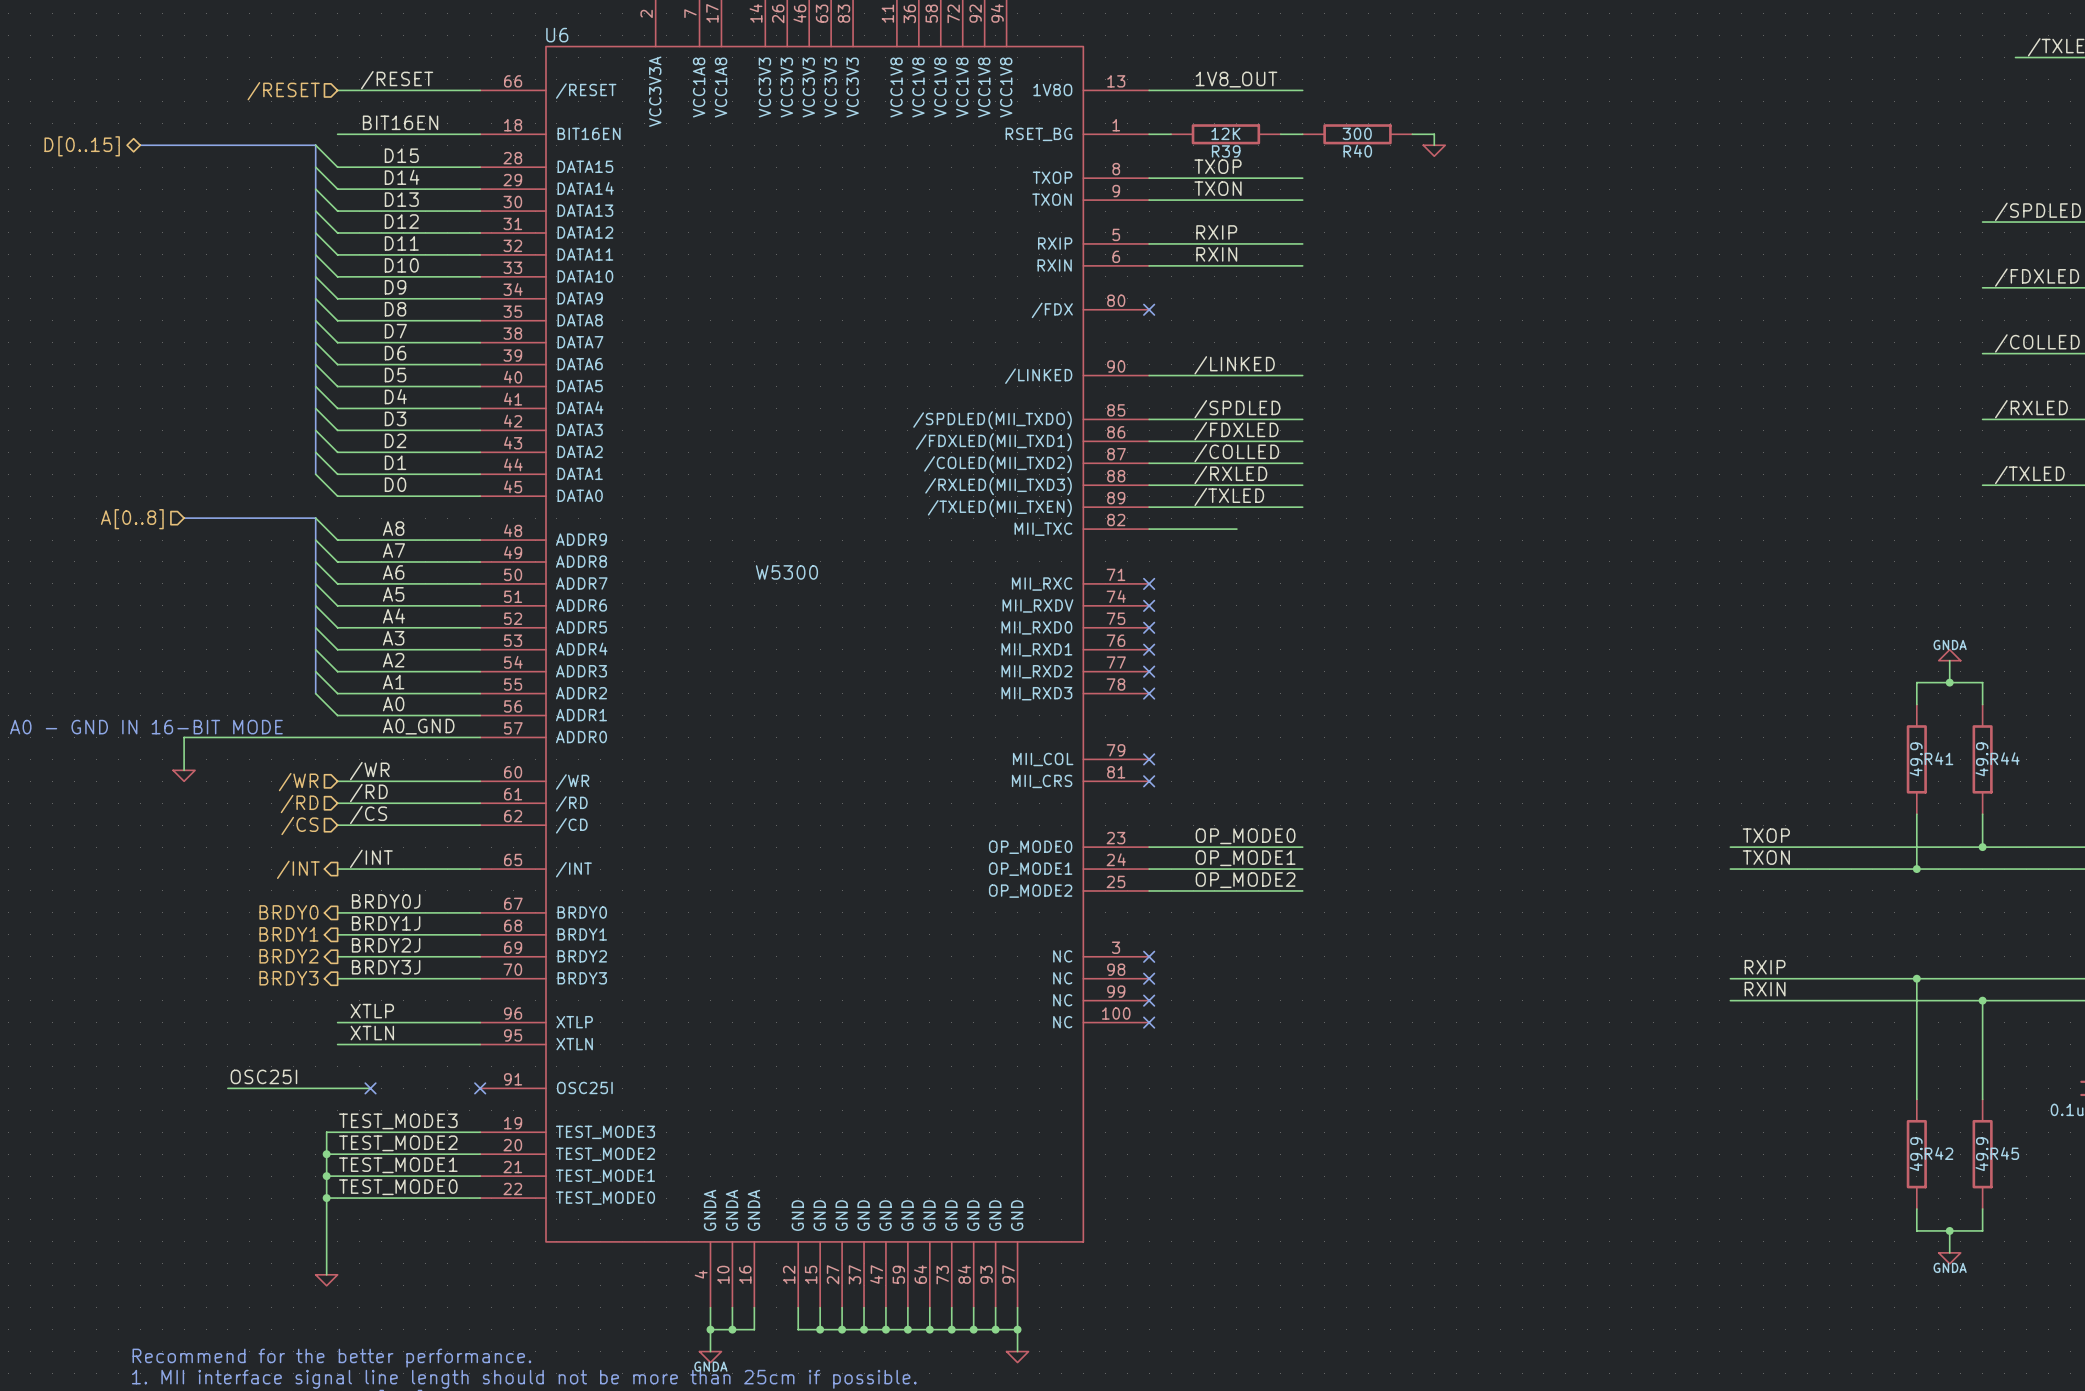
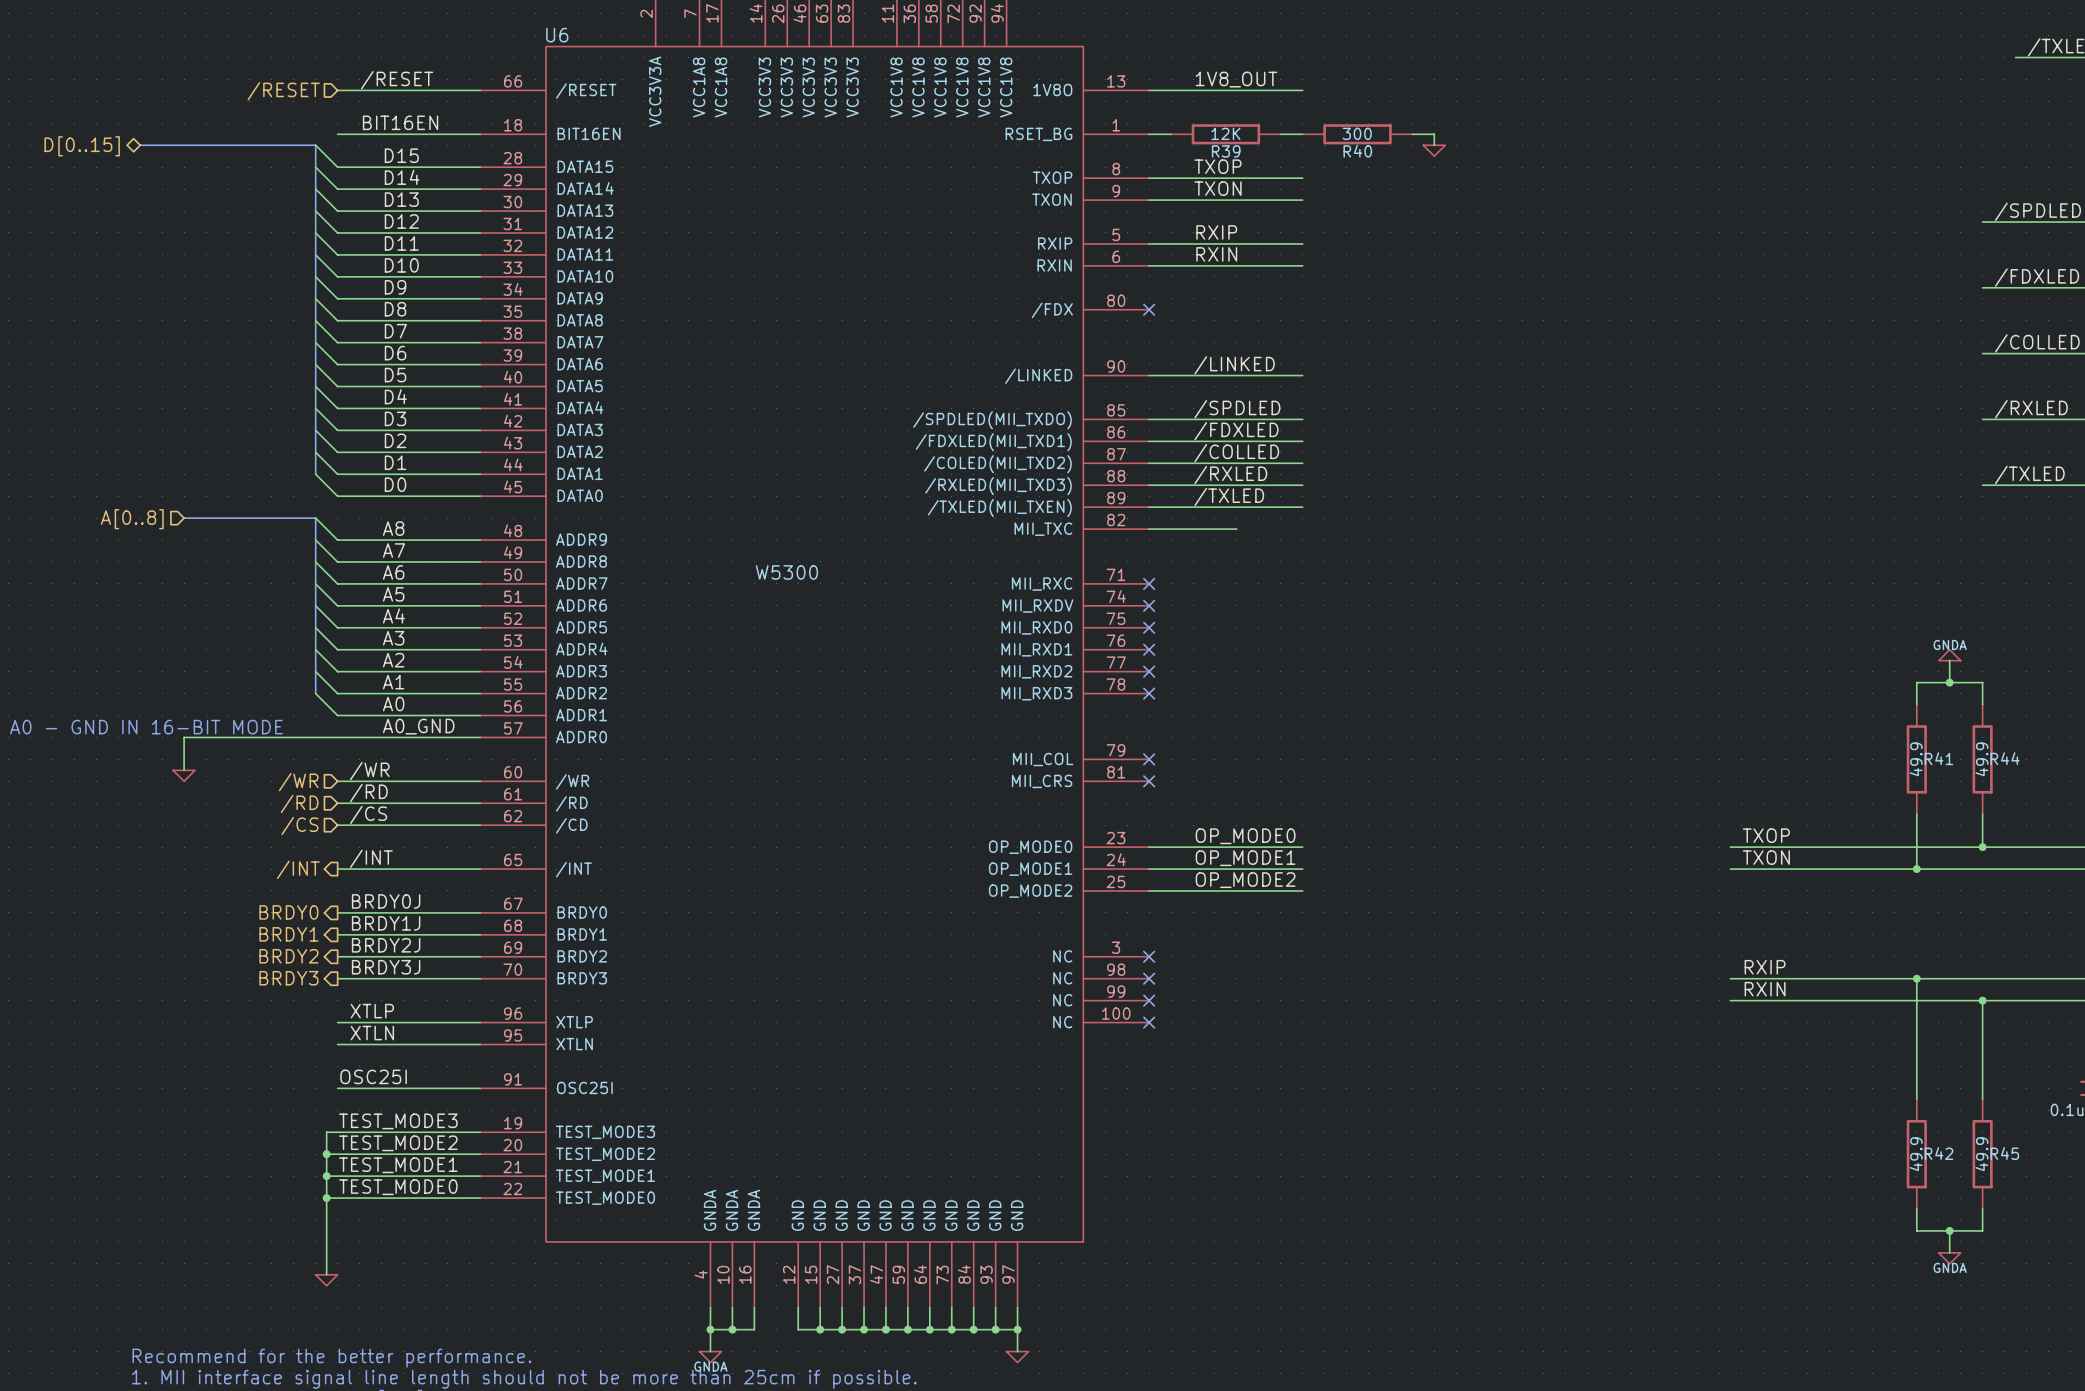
label position: OSC25I (263, 1076) -> OSC25I (373, 1076)
wire: (227, 1088) (337, 1088) -> (370, 1088) (480, 1088)
no-connect mark: (370, 1088) -> none
no-connect mark: (480, 1088) -> none

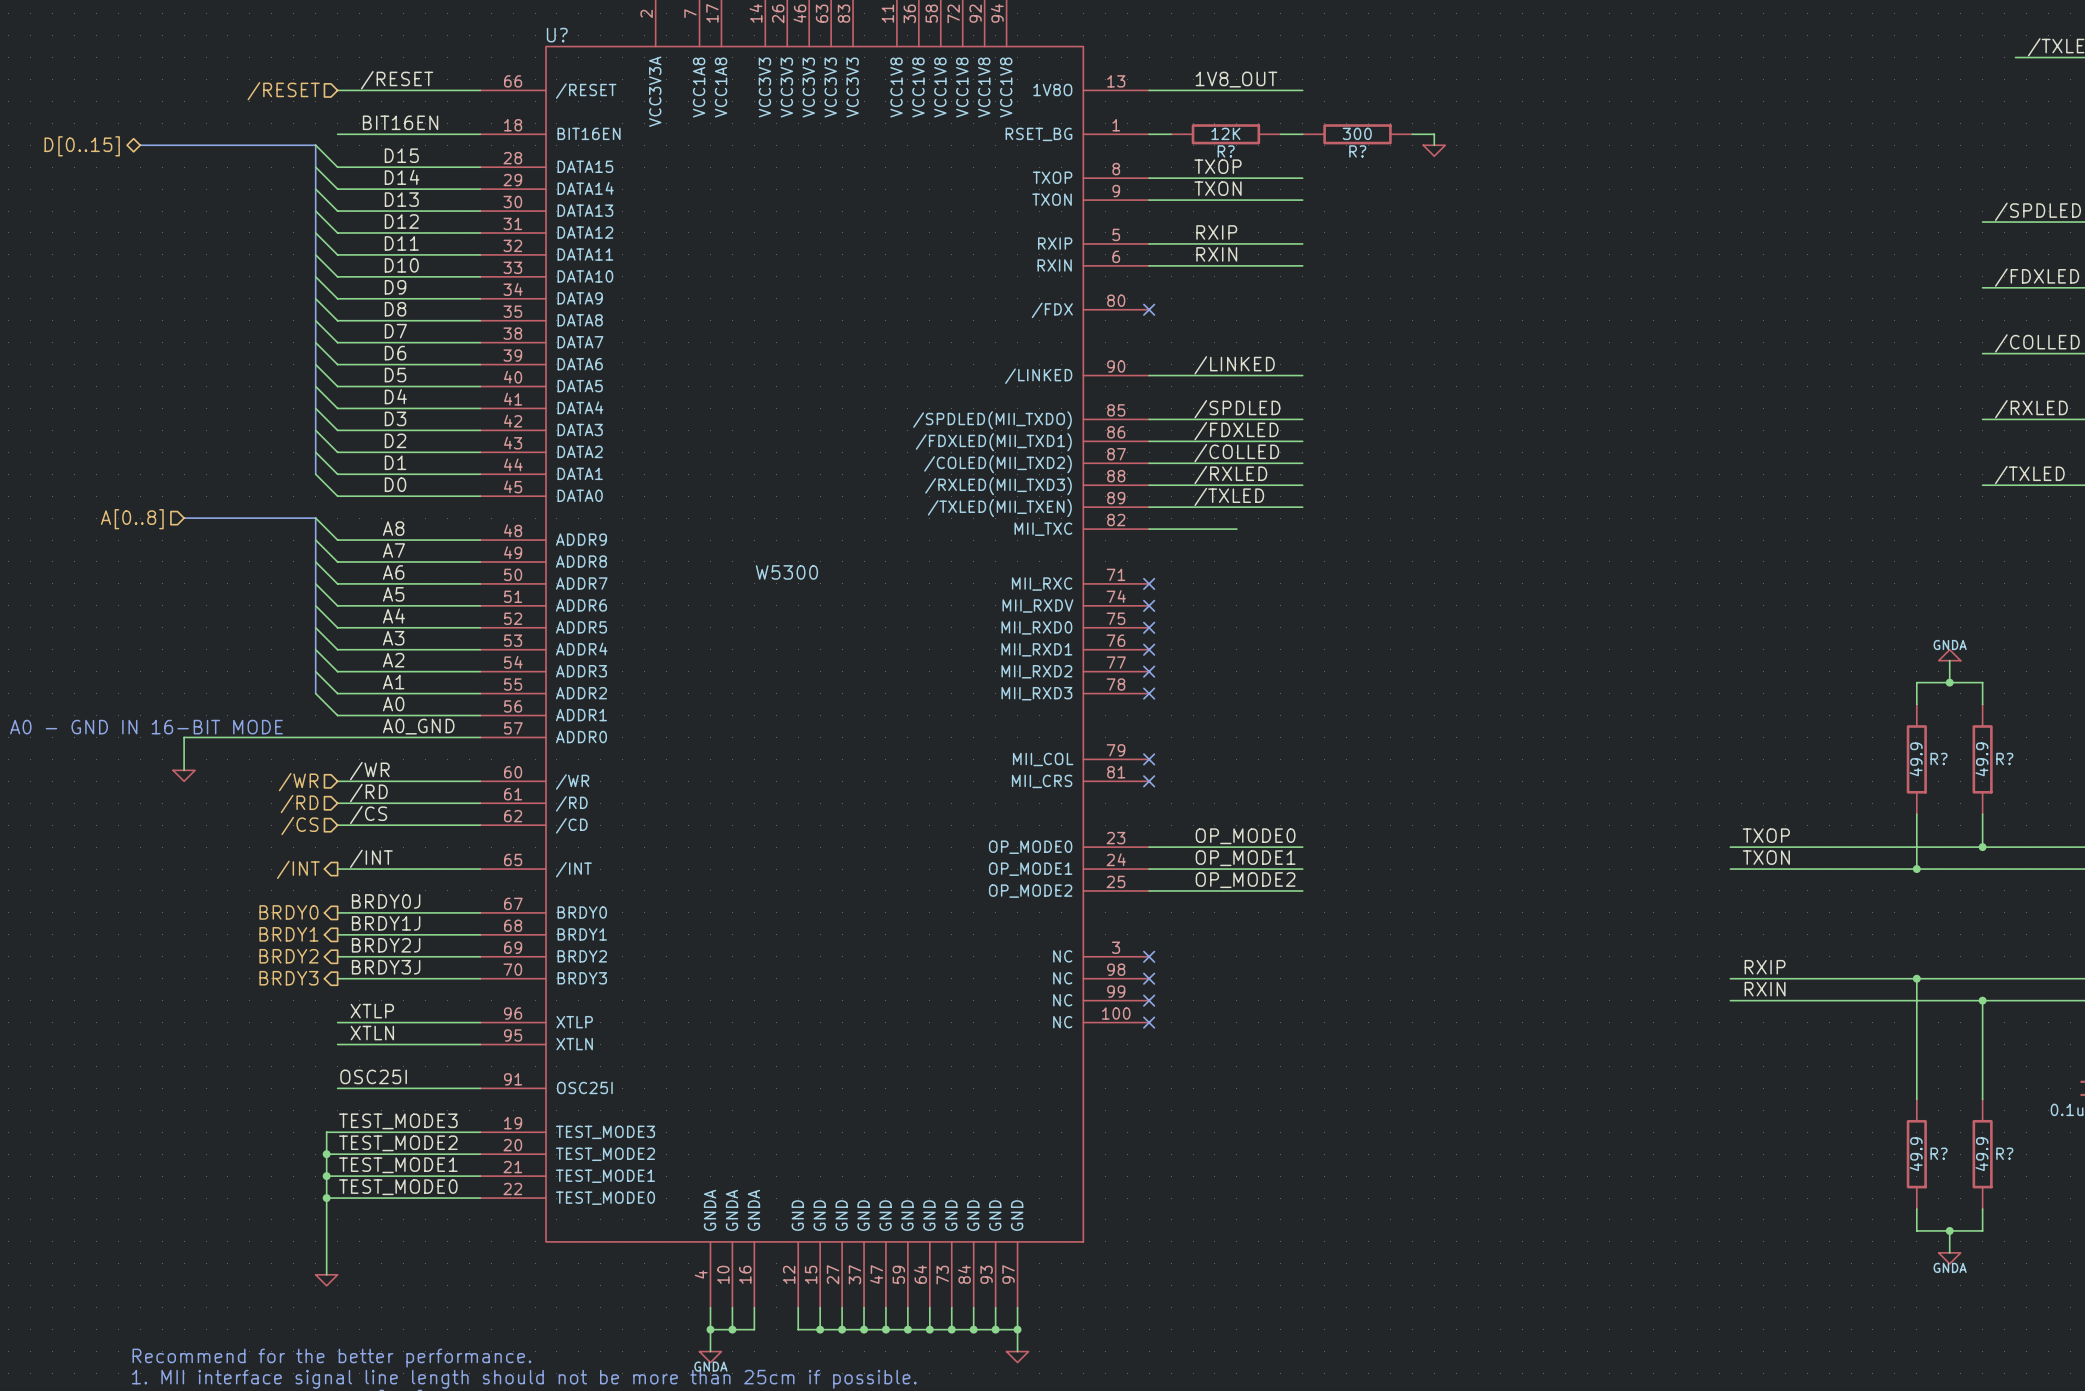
U6 name: U6 (557, 35) -> U? (557, 35)
R39 name: R39 (1226, 151) -> R? (1226, 151)
R40 name: R40 (1357, 151) -> R? (1357, 151)
R41 name: R41 (1939, 758) -> R? (1939, 758)
R44 name: R44 (2005, 758) -> R? (2004, 758)
R42 name: R42 (1939, 1153) -> R? (1939, 1153)
R45 name: R45 (2004, 1153) -> R? (2004, 1153)

